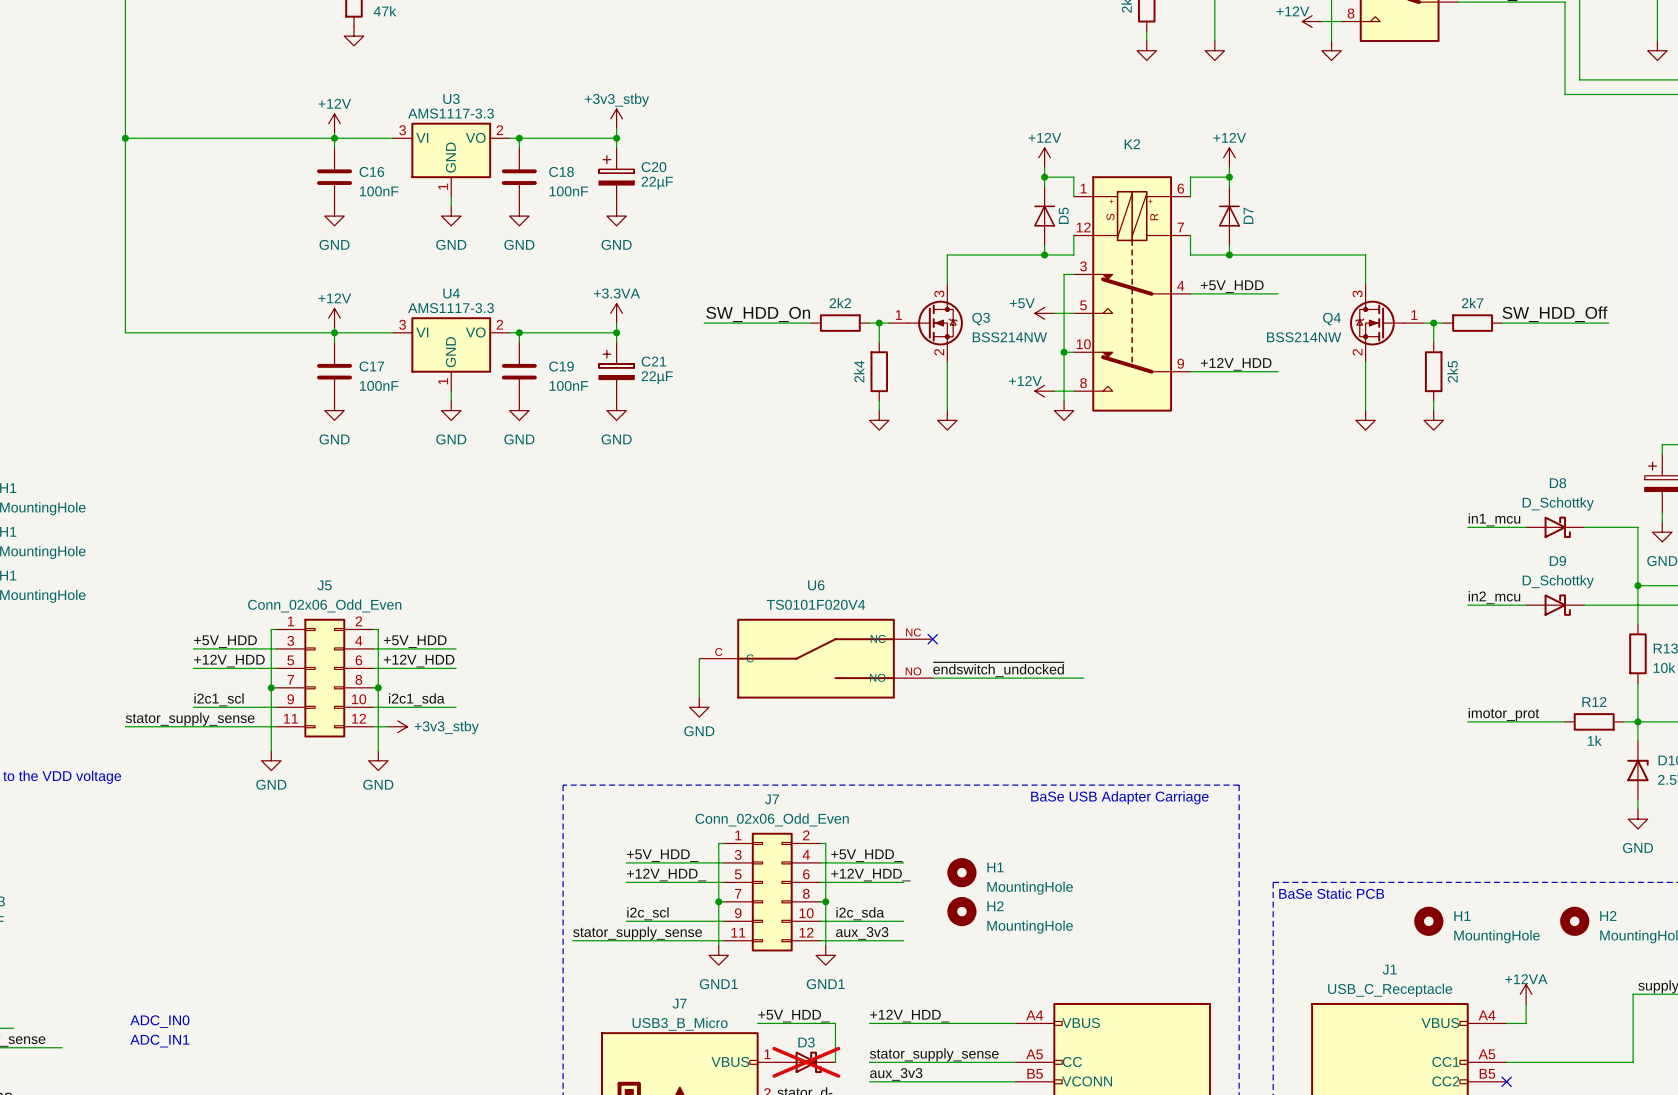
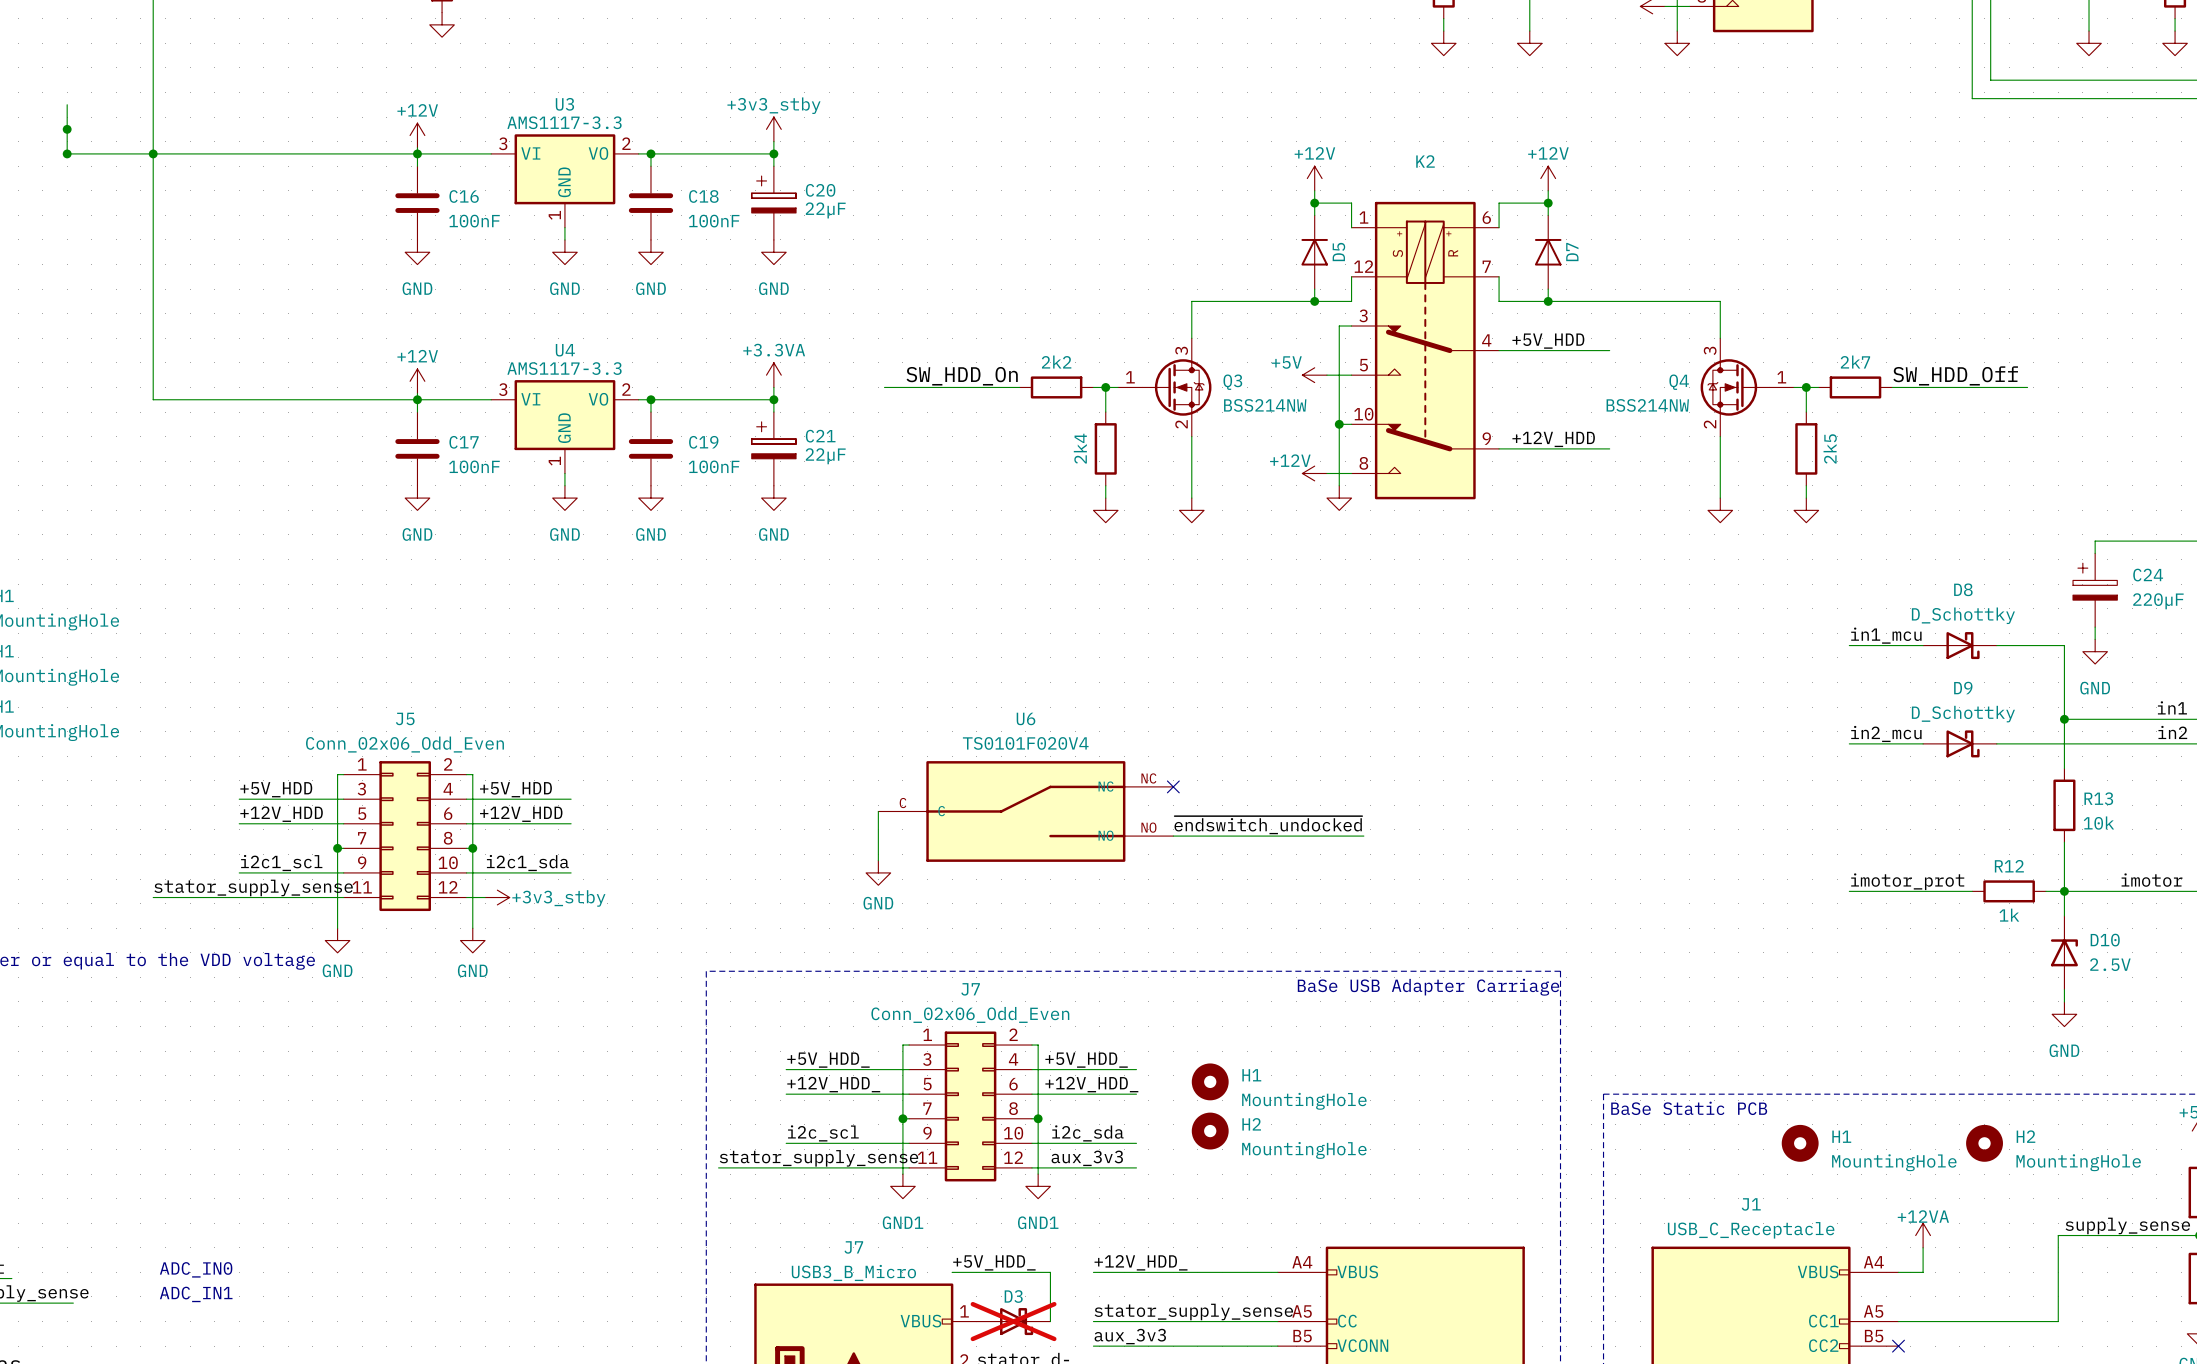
wire: none -> (67, 104) (67, 153) (153, 153)
junction: none -> (67, 129)
junction: none -> (67, 153)

